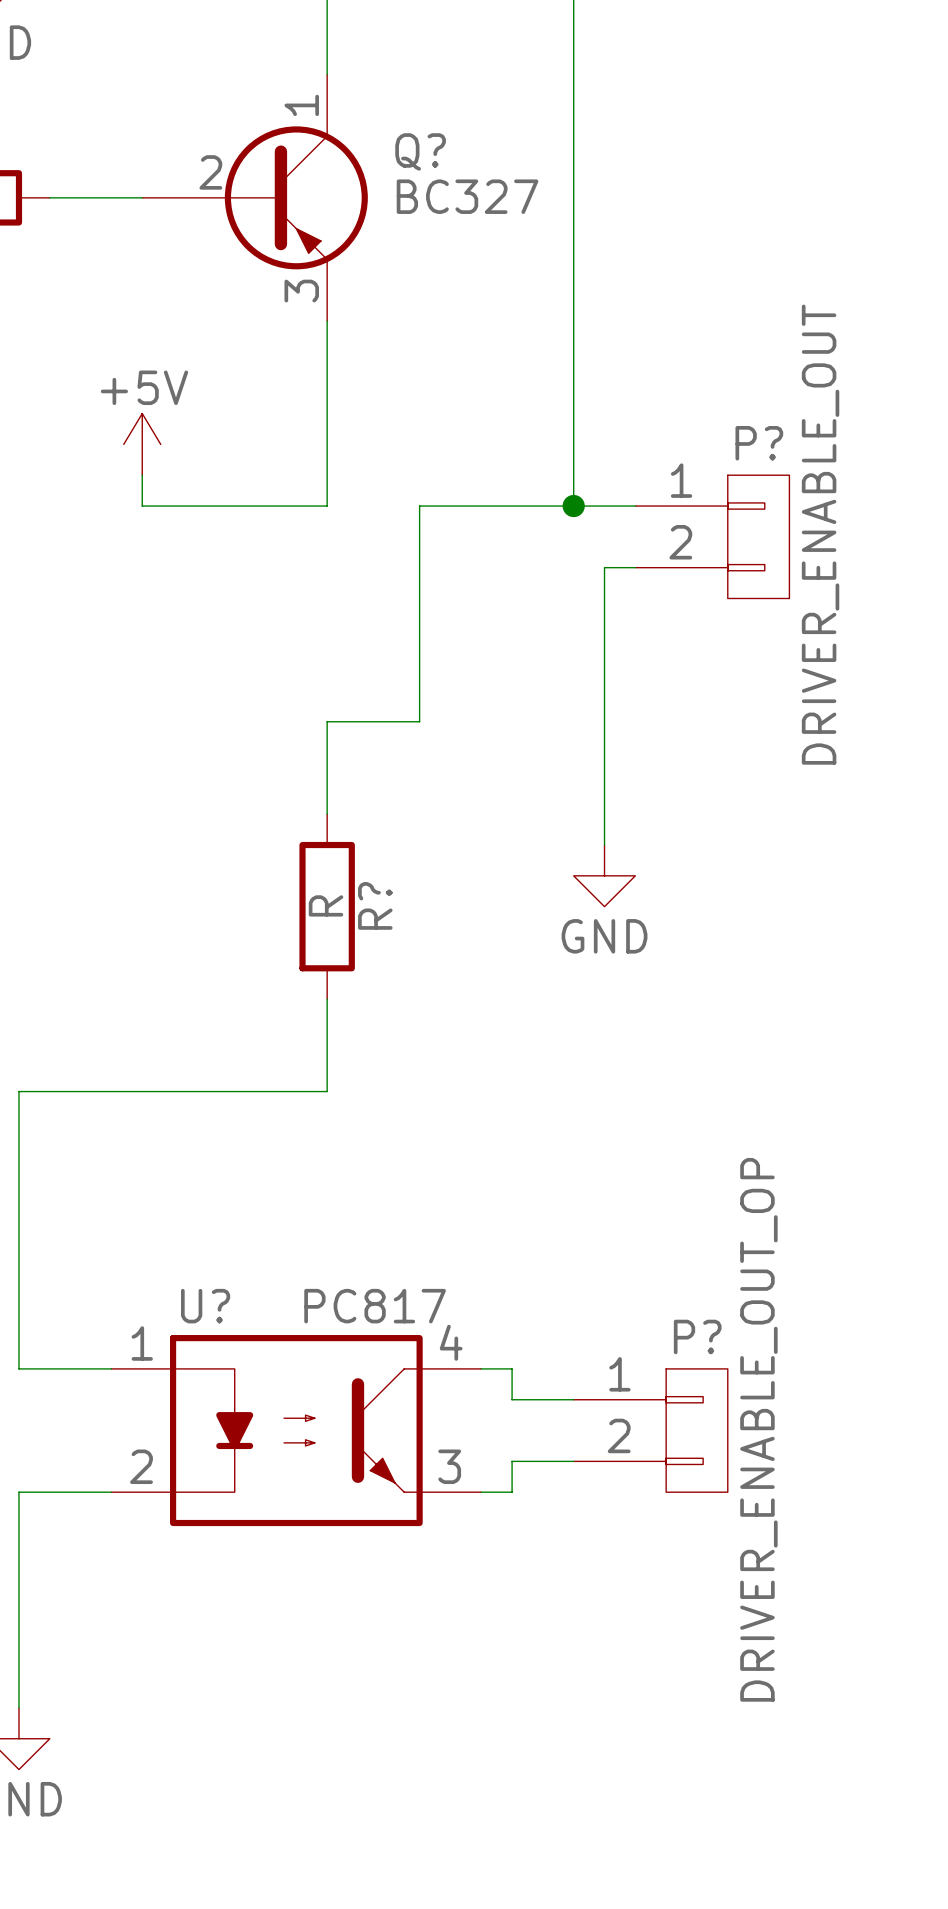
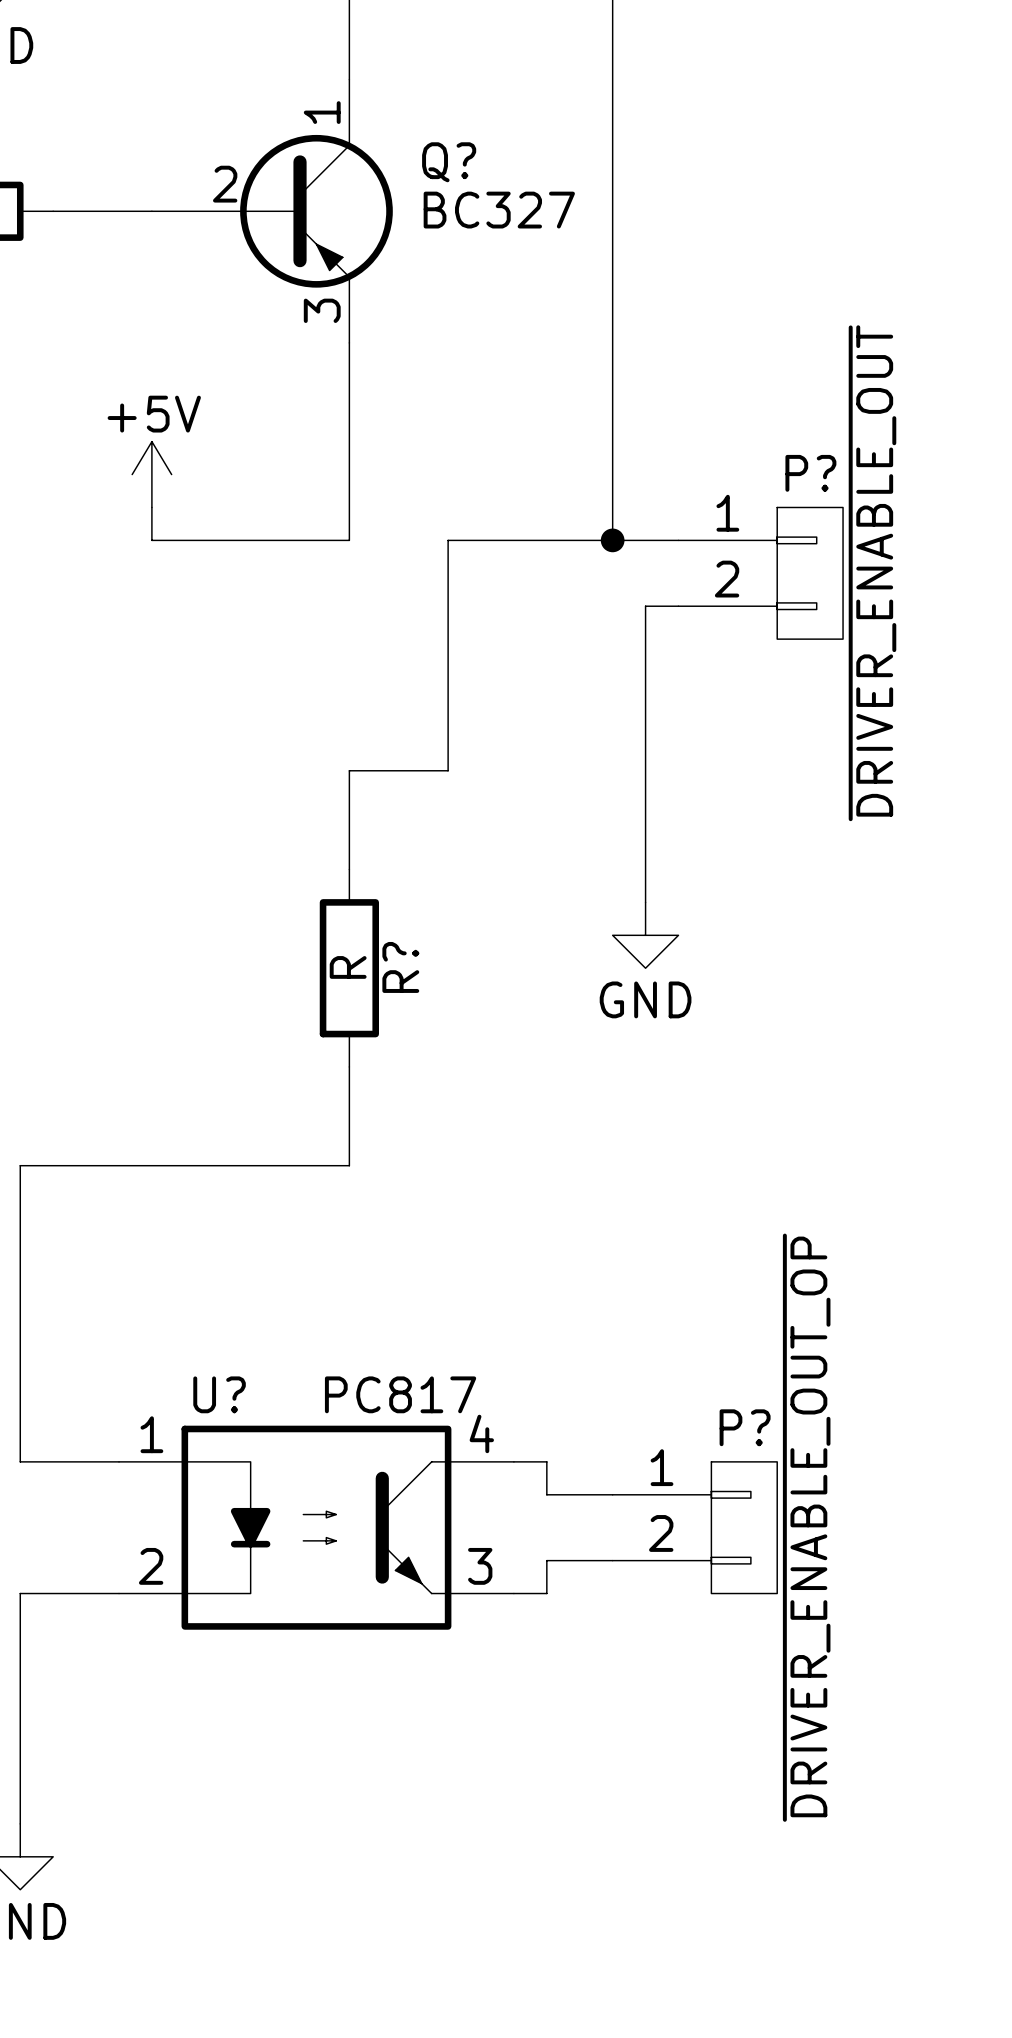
P? value: DRIVER_ENABLE_OUT (820, 534) -> ~{DRIVER_ENABLE_OUT} (872, 573)
P? value: DRIVER_ENABLE_OUT_OP (758, 1429) -> ~{DRIVER_ENABLE_OUT_OP} (806, 1527)

